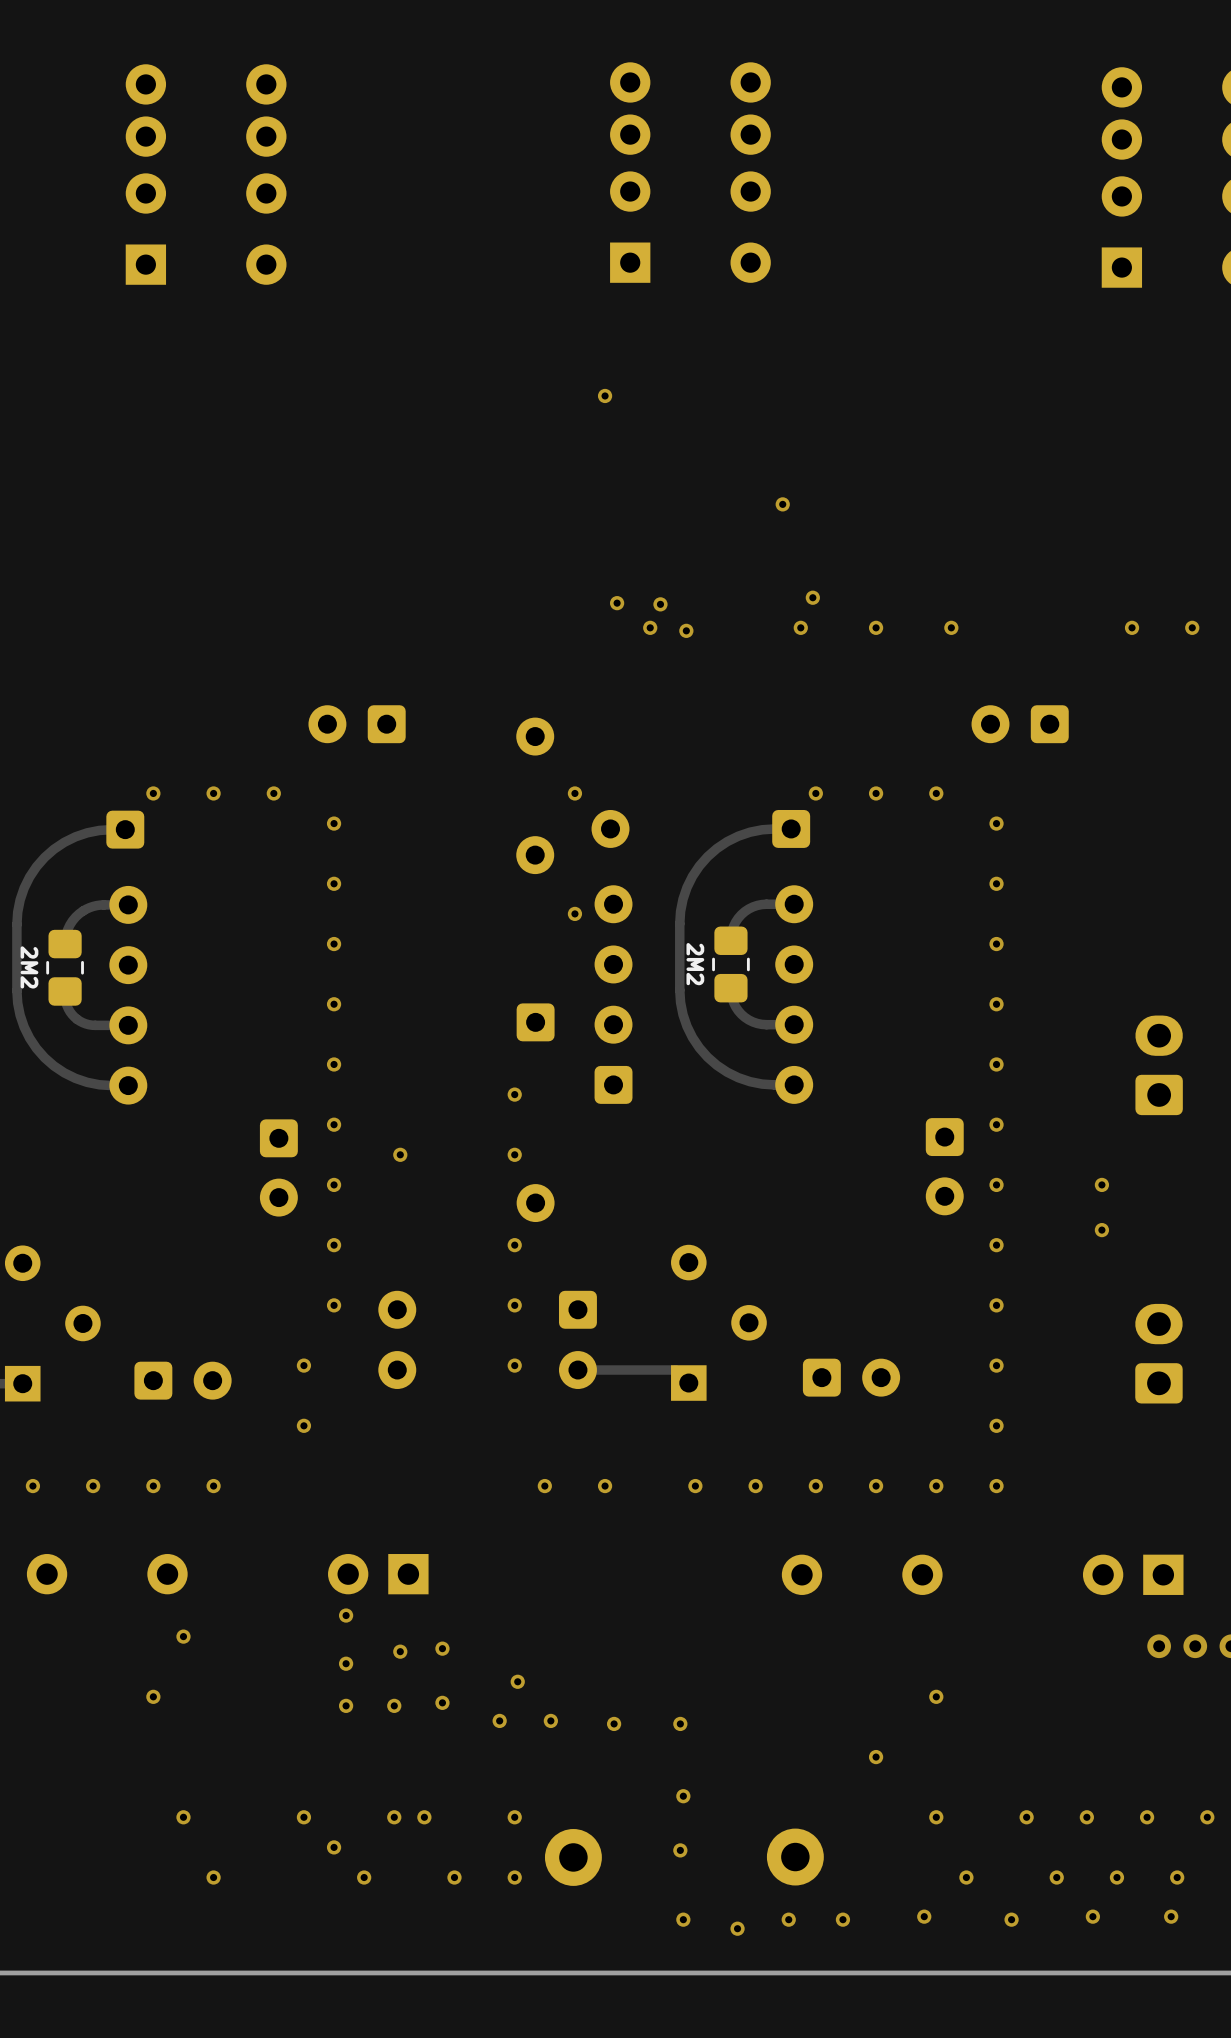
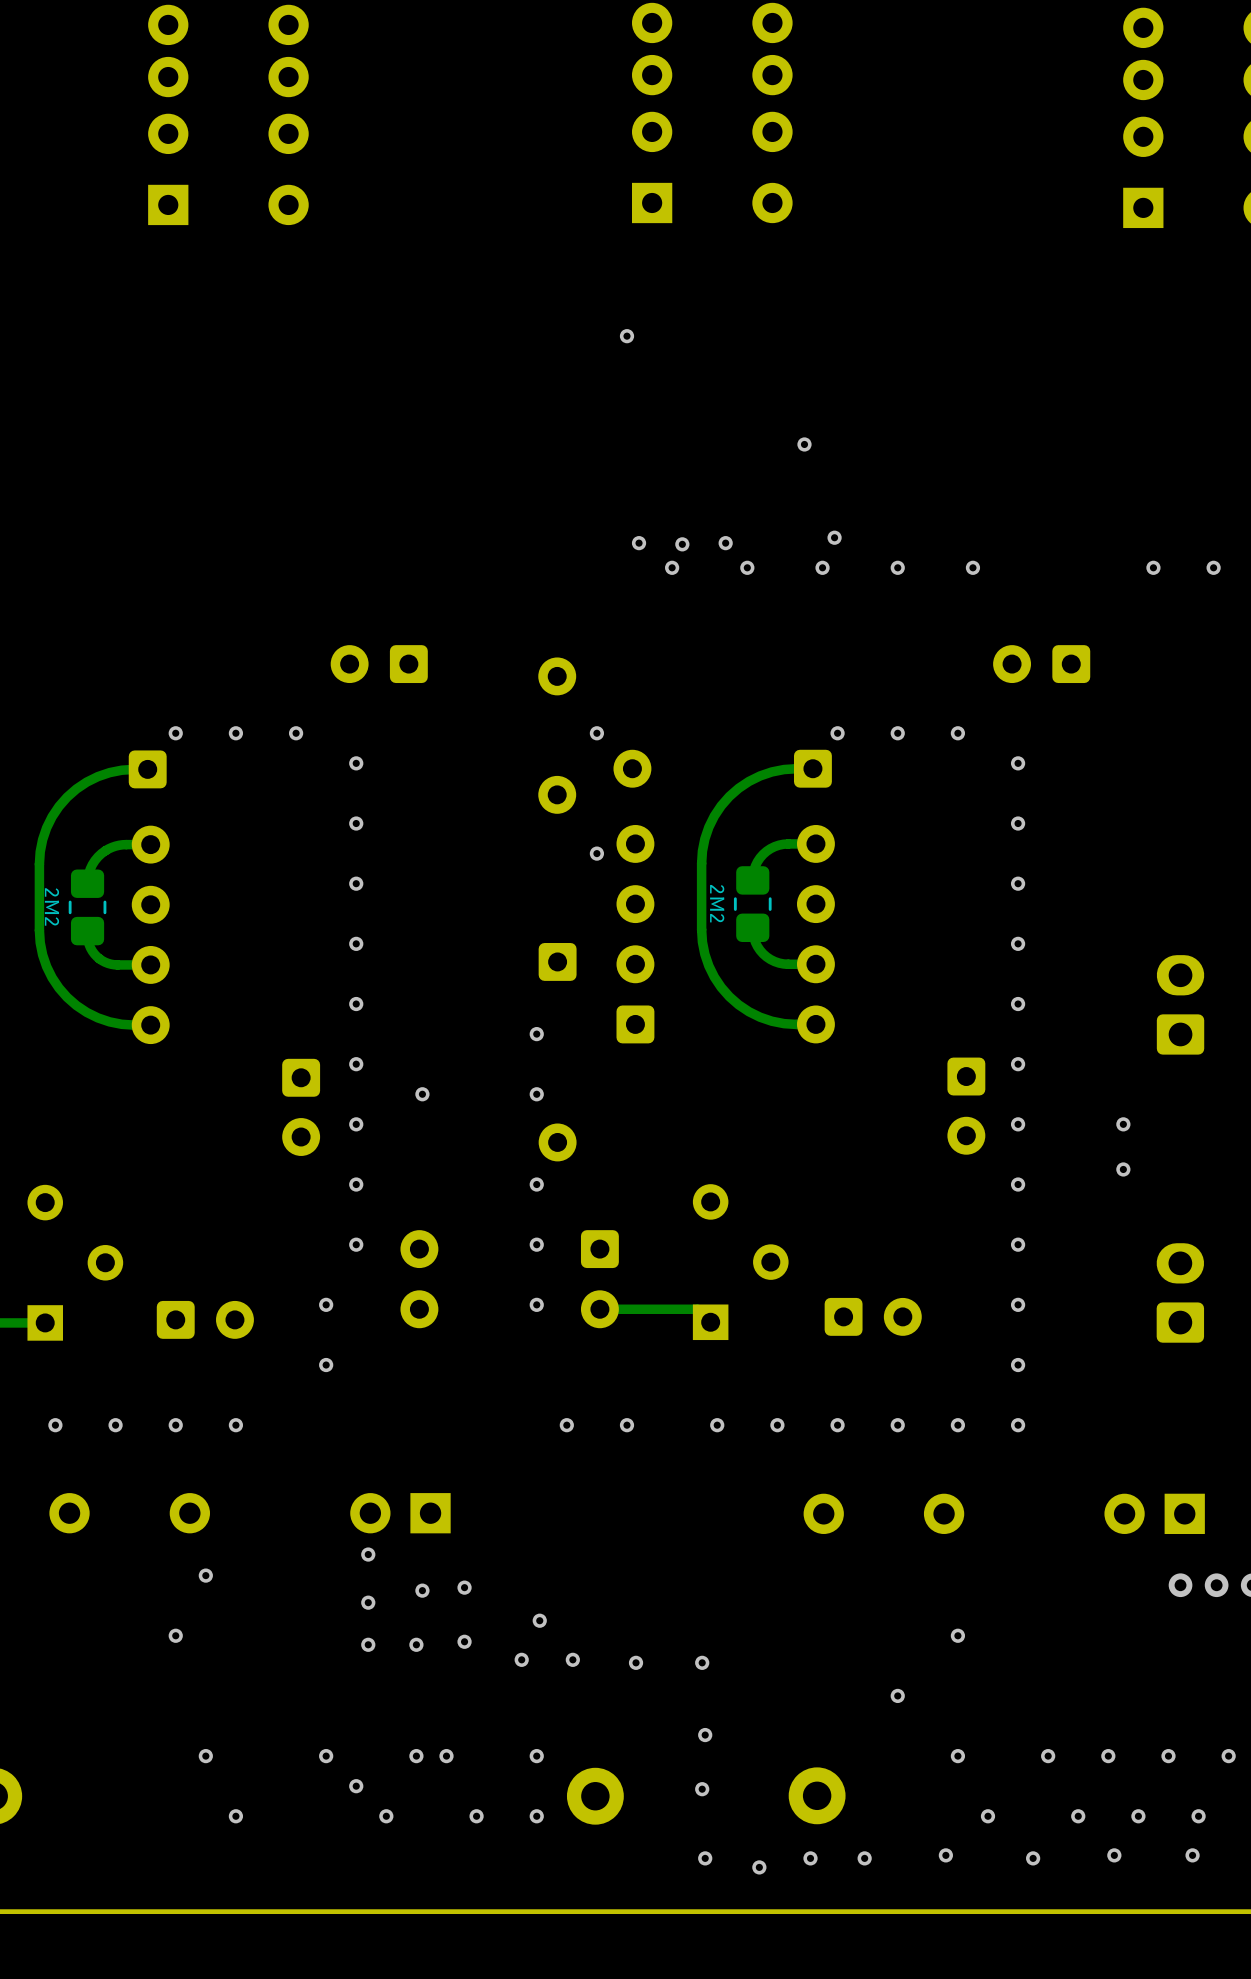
via: none -> (725, 543)
via: none -> (747, 567)
via: (686, 630) -> none

